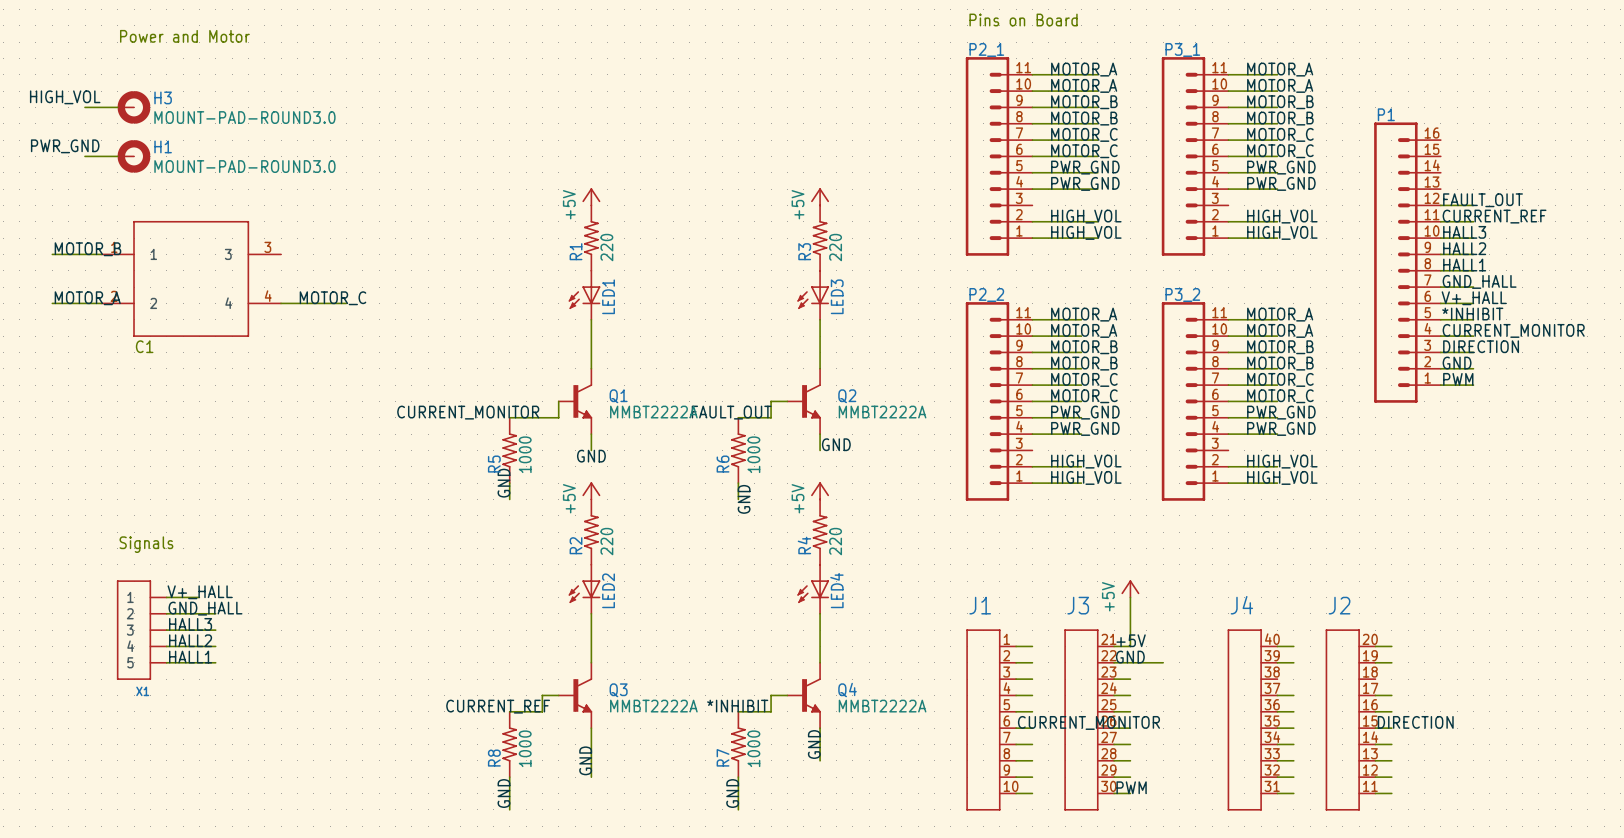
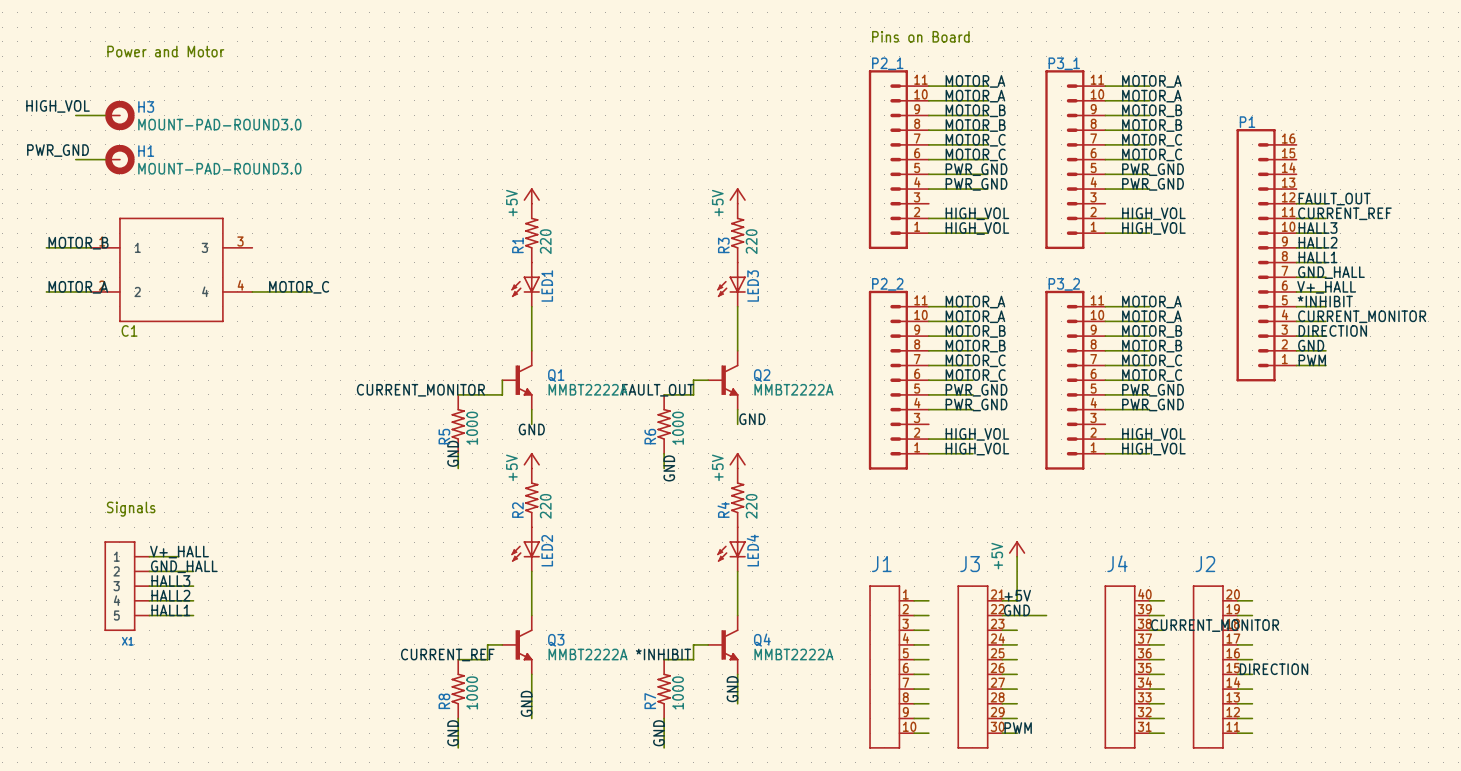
label: none -> CURRENT_MONITOR (1215, 625)
wire: none -> (1149, 630) (1164, 630)
label: CURRENT_MONITOR (1088, 722) -> none

